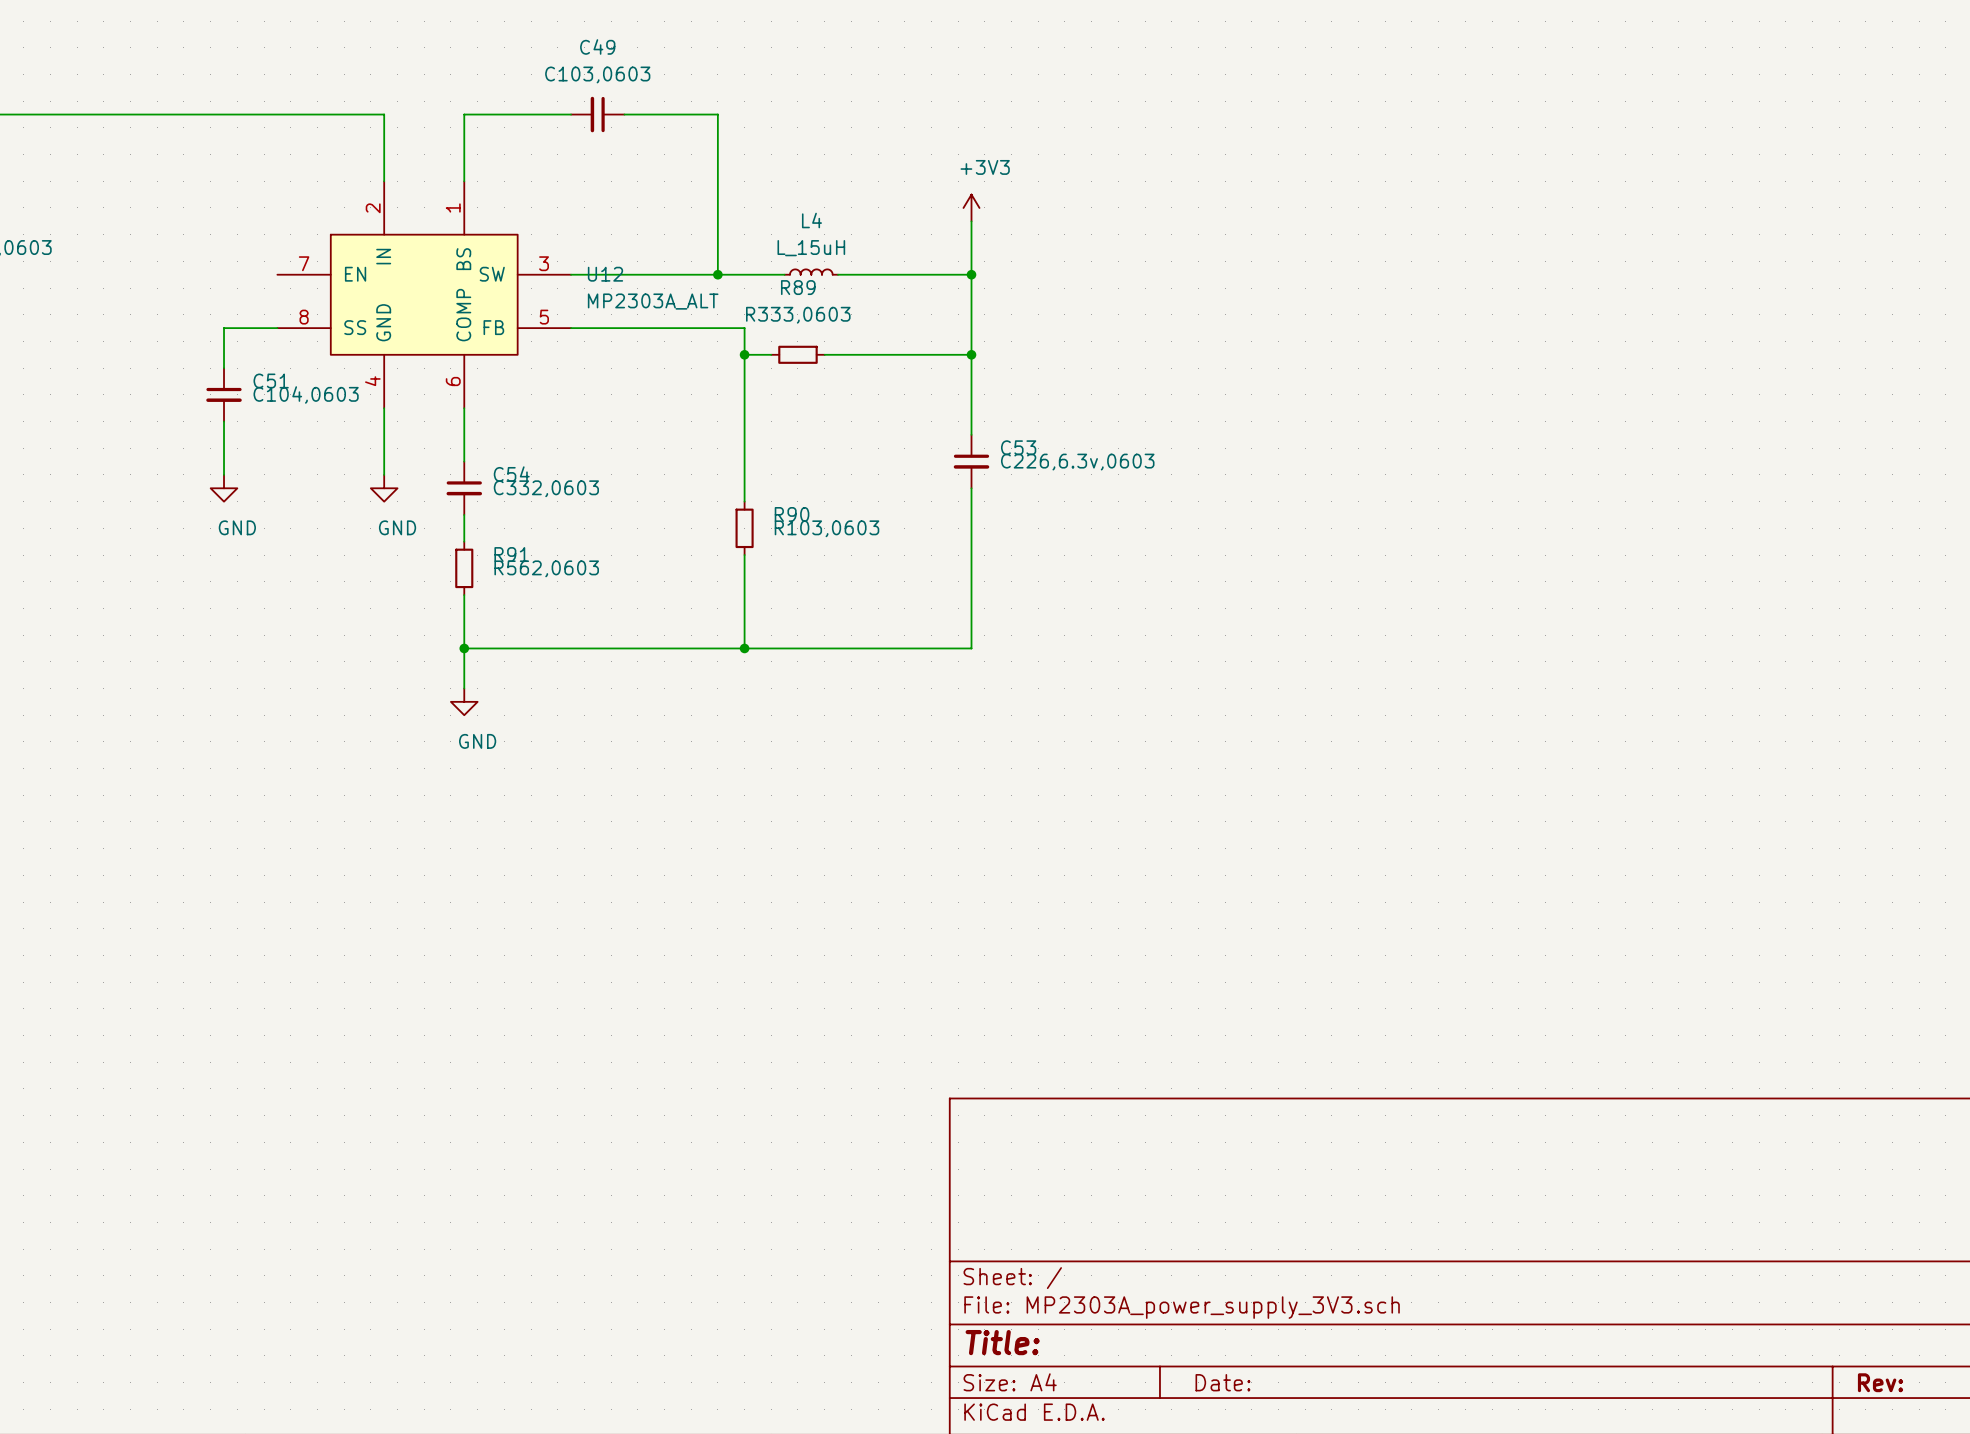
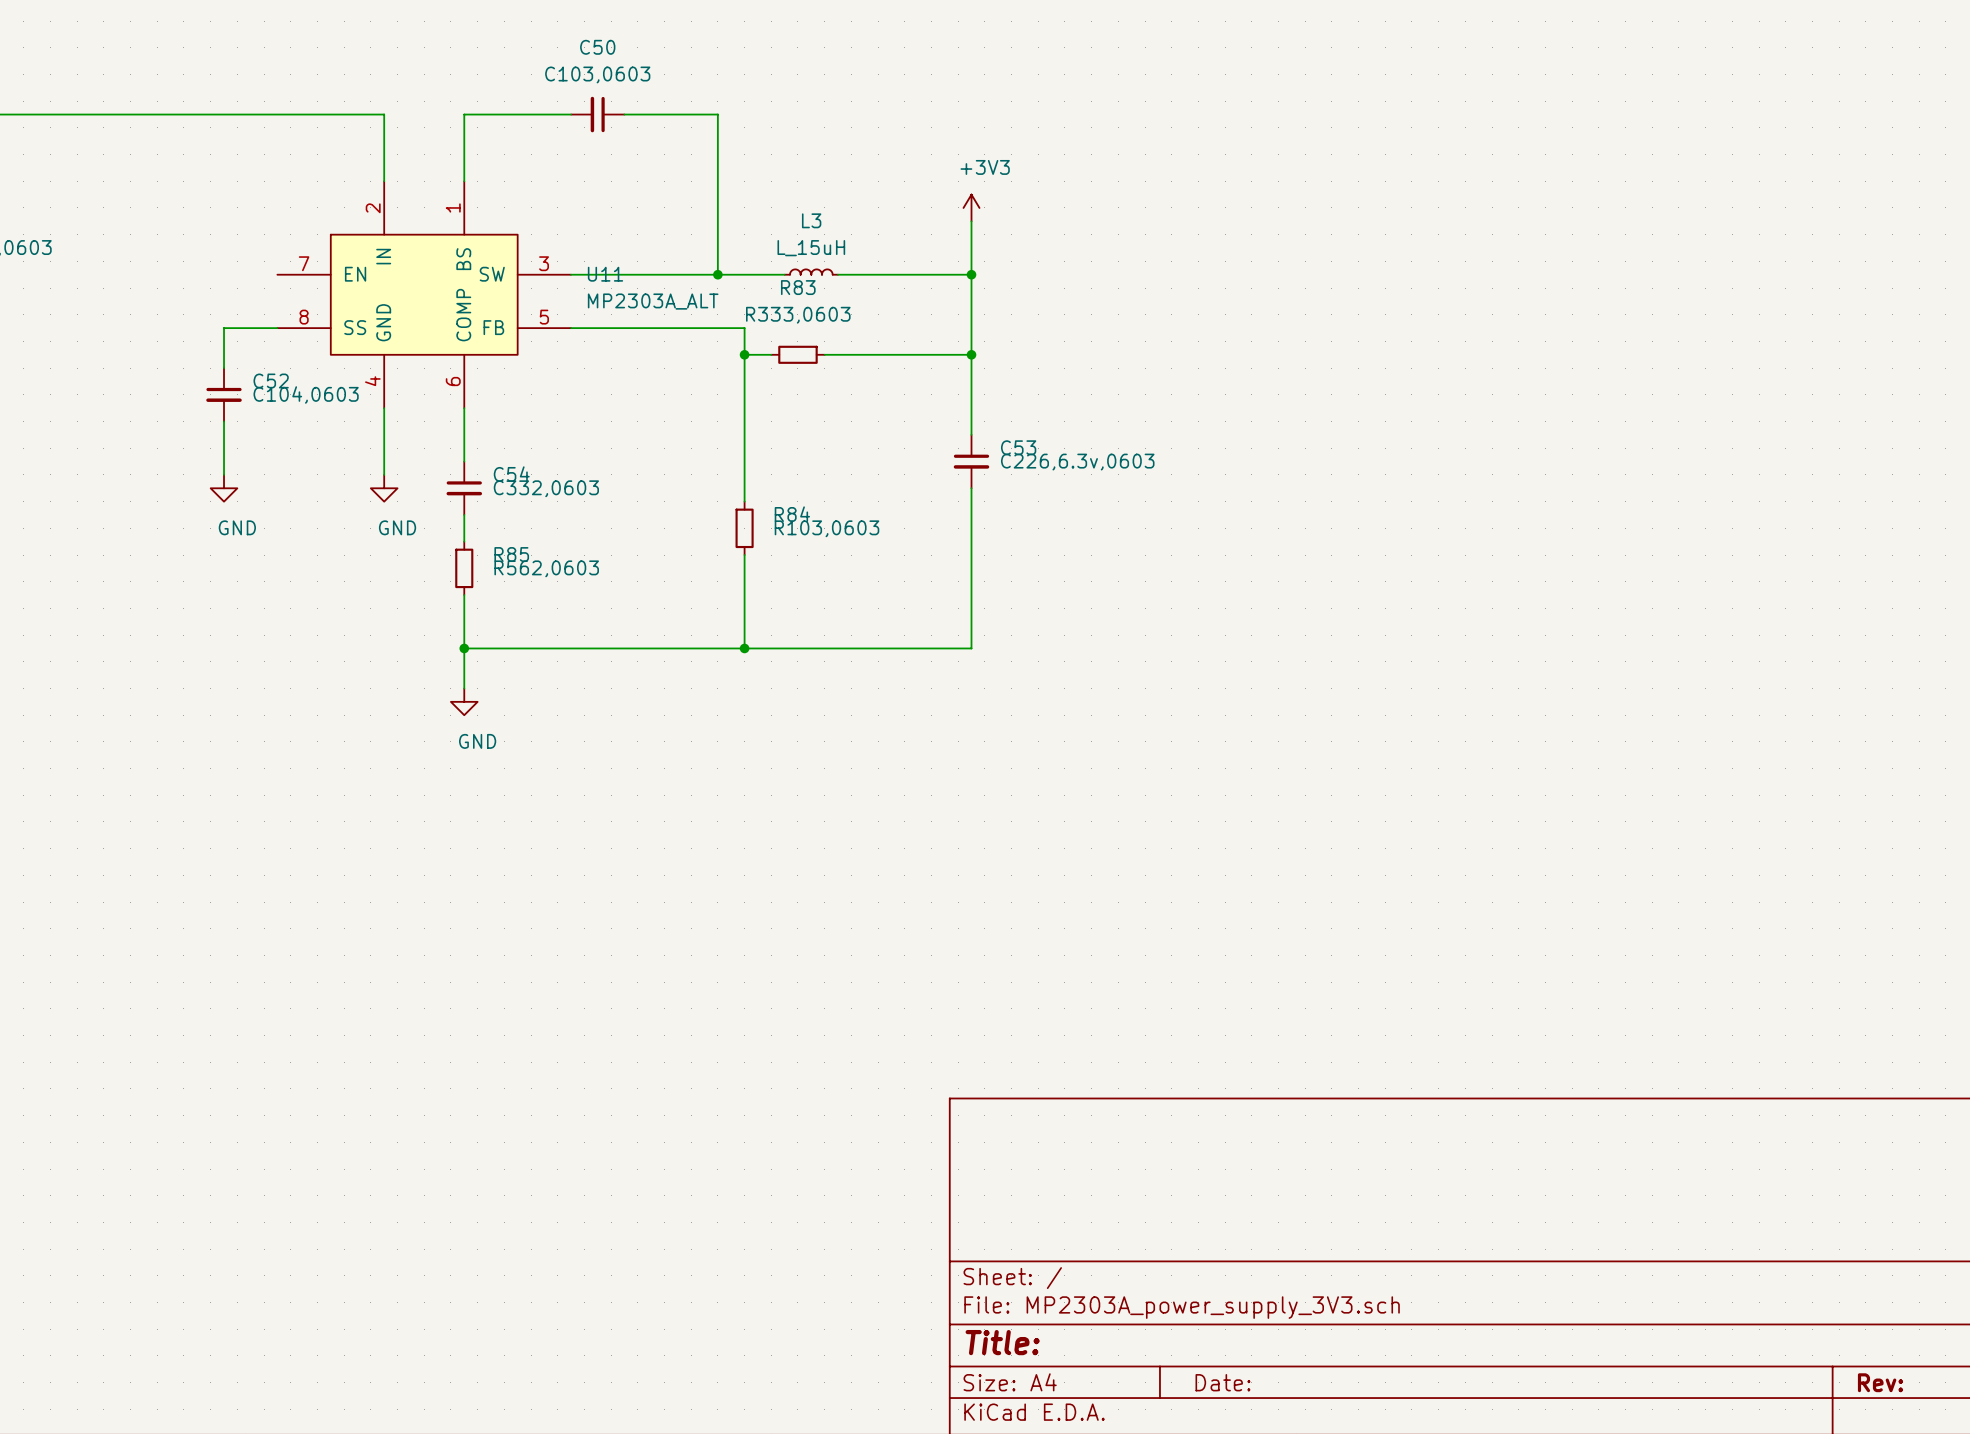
C49 name: C49 (597, 46) -> C50 (597, 47)
L4 name: L4 (811, 220) -> L3 (811, 220)
U12 name: U12 (605, 274) -> U11 (605, 274)
R89 name: R89 (798, 287) -> R83 (798, 287)
C51 name: C51 (271, 381) -> C52 (271, 381)
R90 name: R90 (792, 514) -> R84 (792, 514)
R91 name: R91 (511, 554) -> R85 (511, 554)

